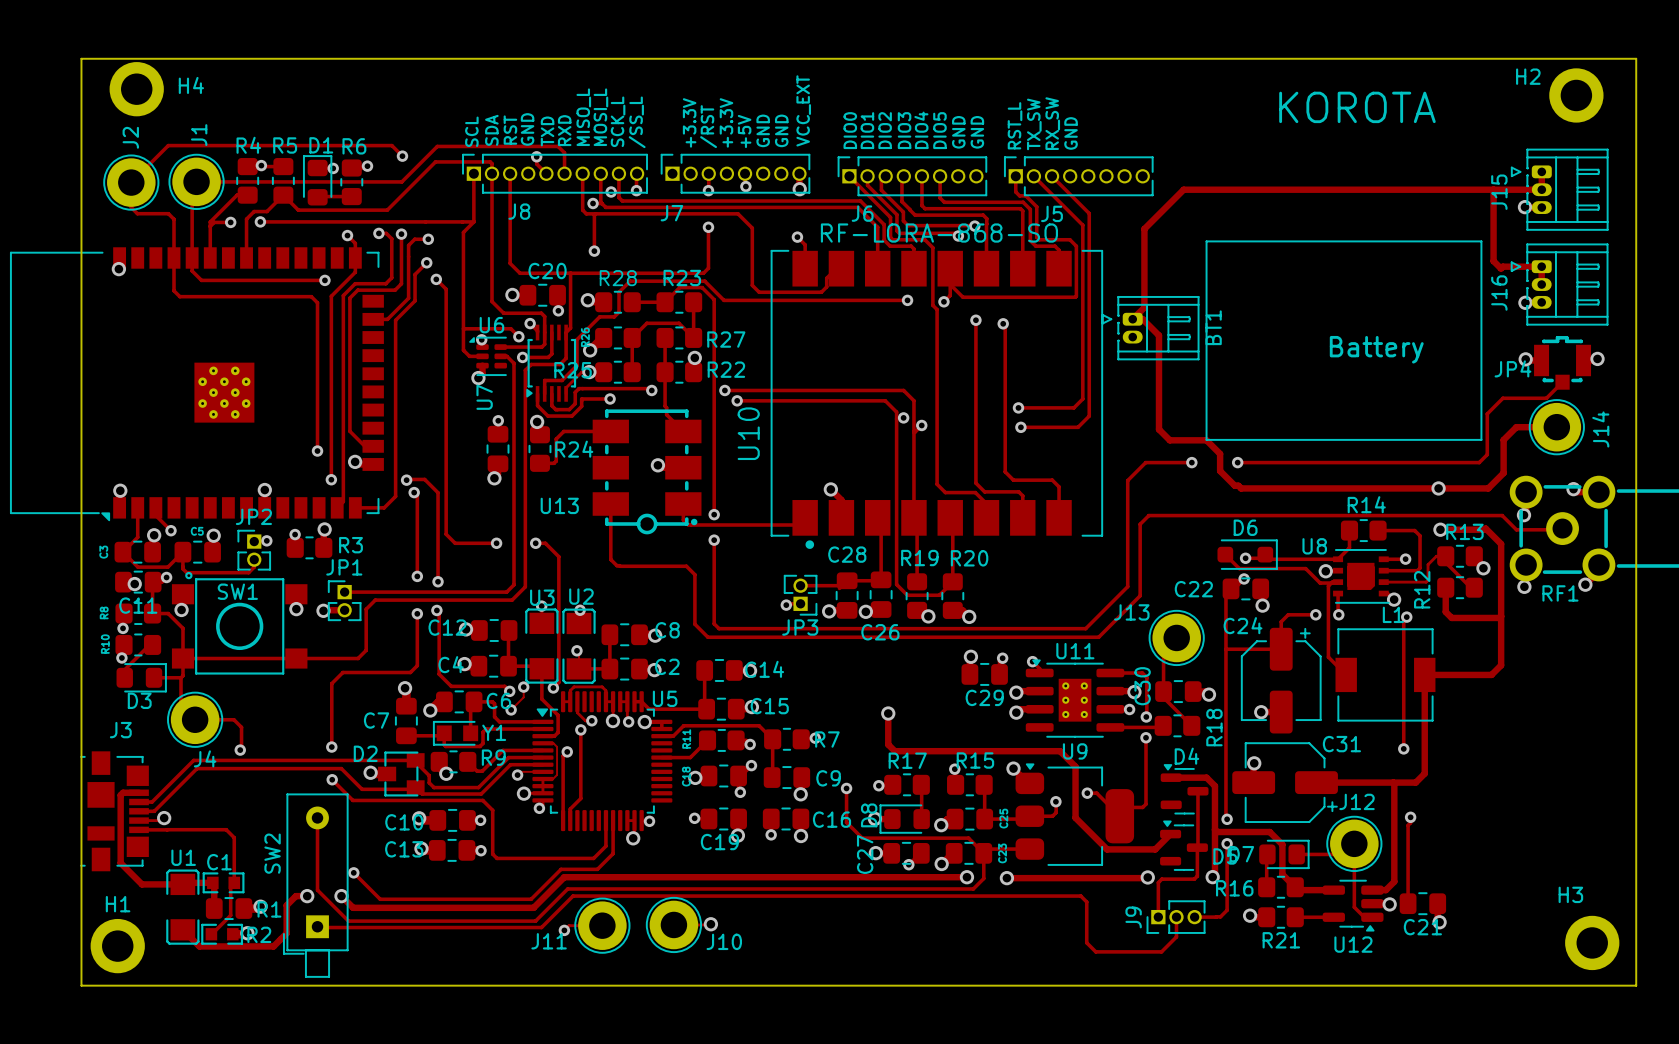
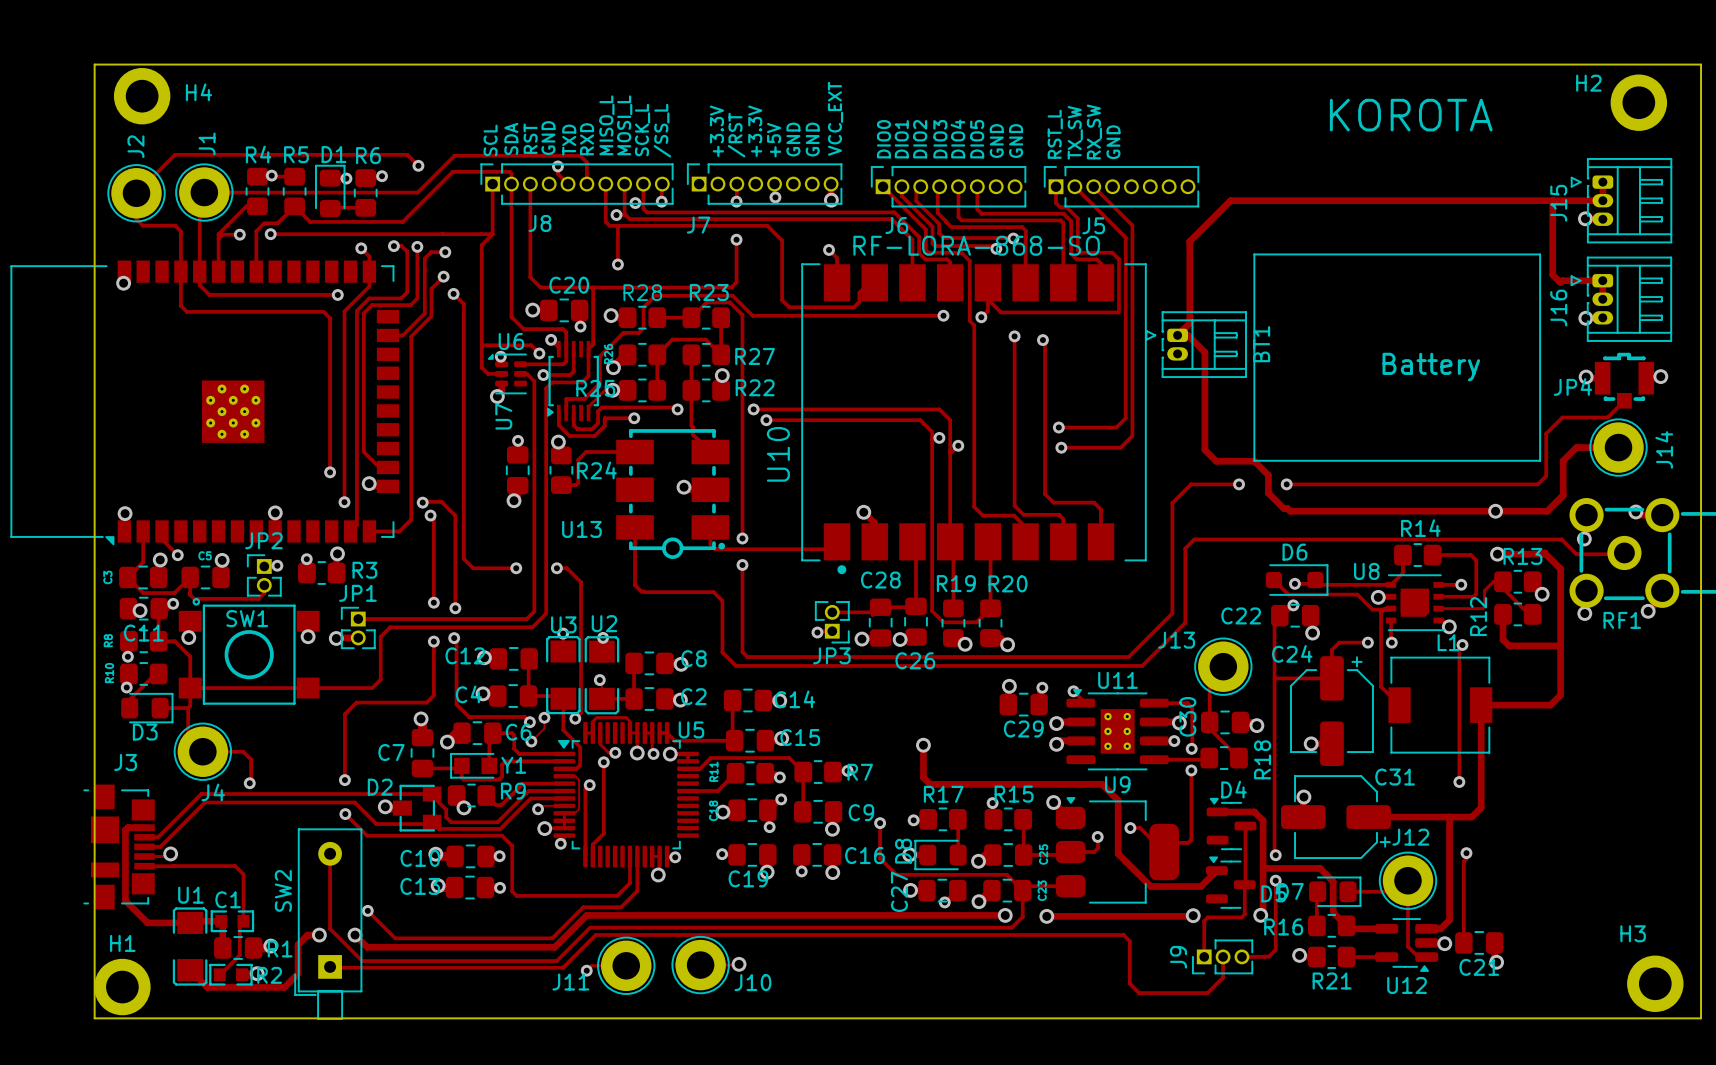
board edge: (91, 58) (81, 58) (81, 985) (1636, 985) (1636, 976) -> (94, 64) (94, 1018) (1701, 1018)

